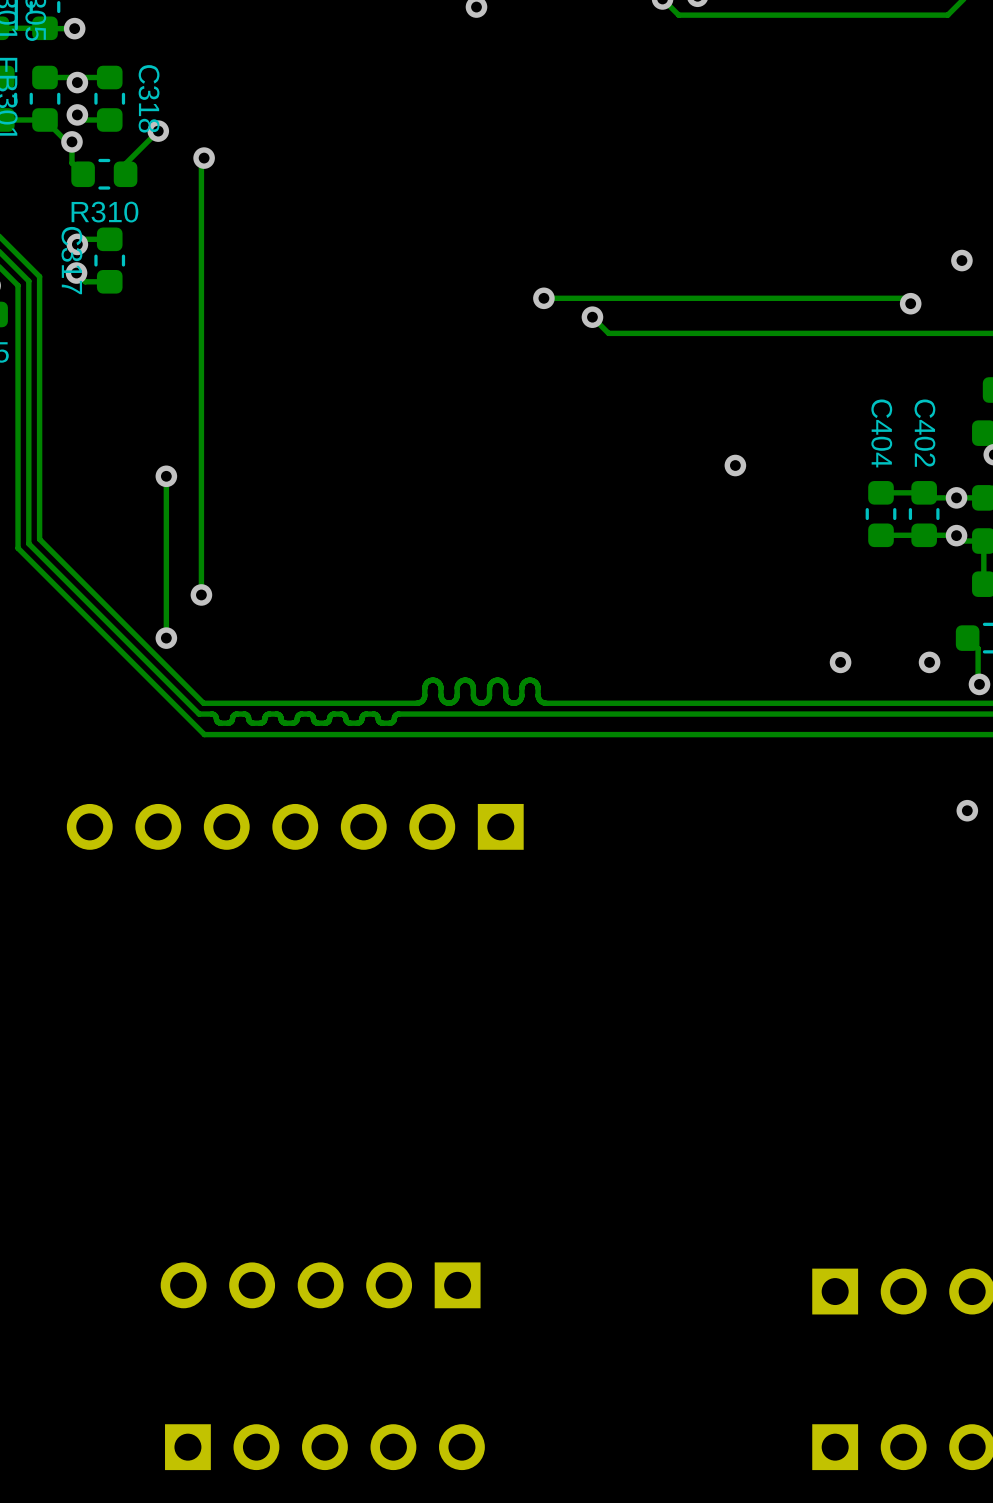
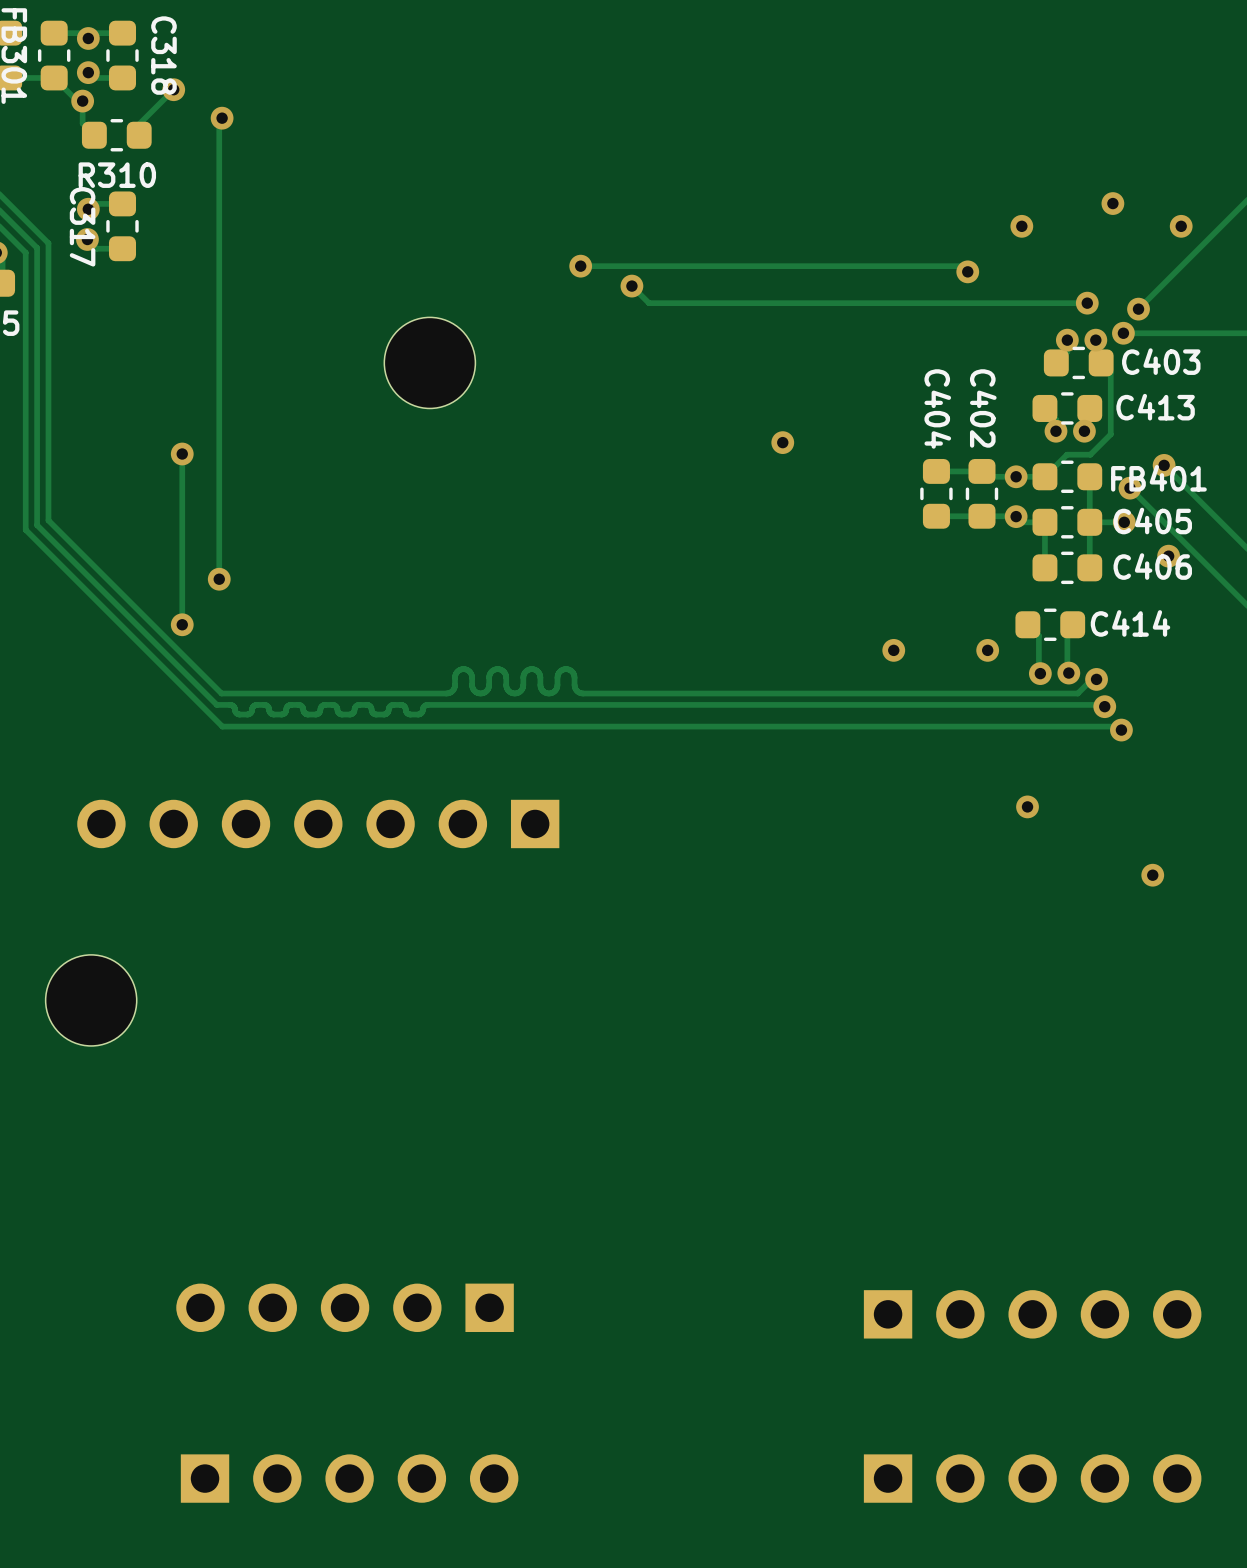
part: none -> (429, 362)
part: none -> (91, 1000)

